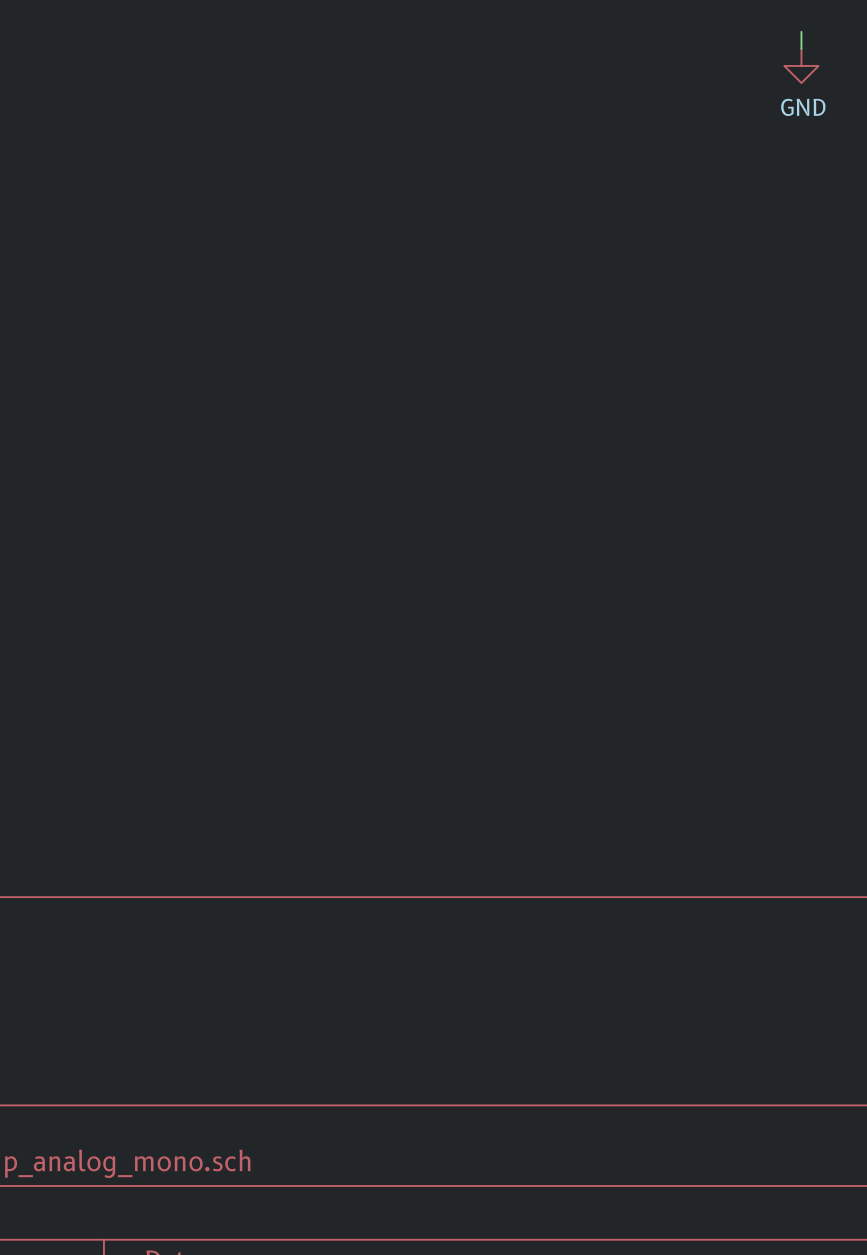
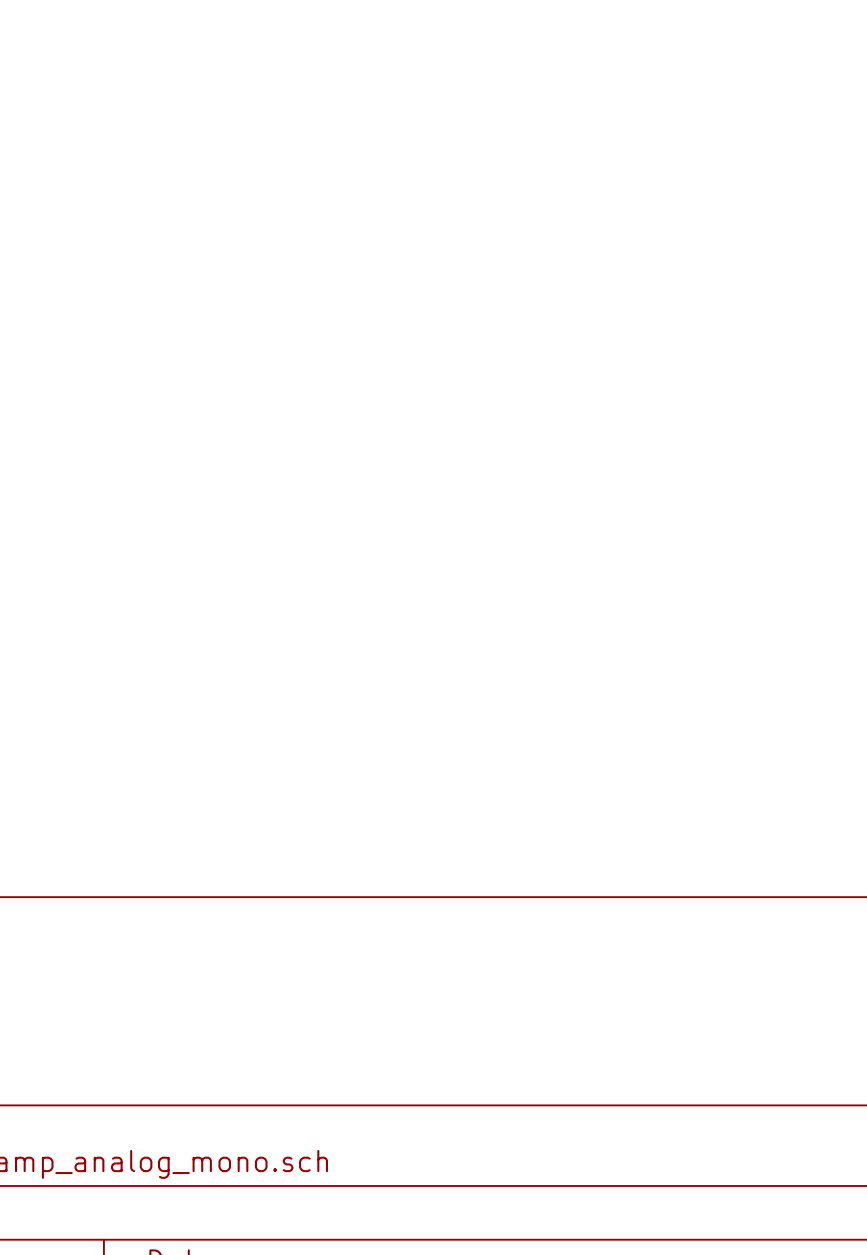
wire: (801, 31) (801, 48) -> none
power symbol: GND (801, 65) -> none

